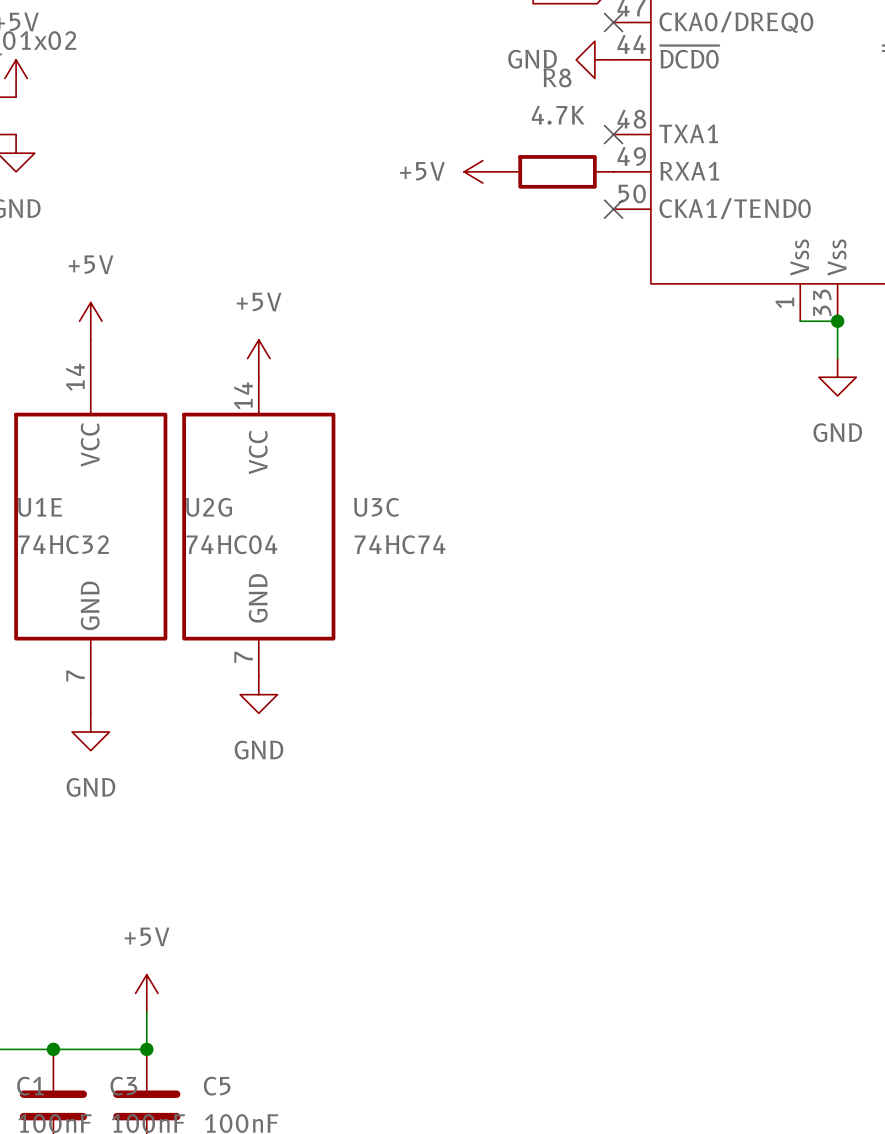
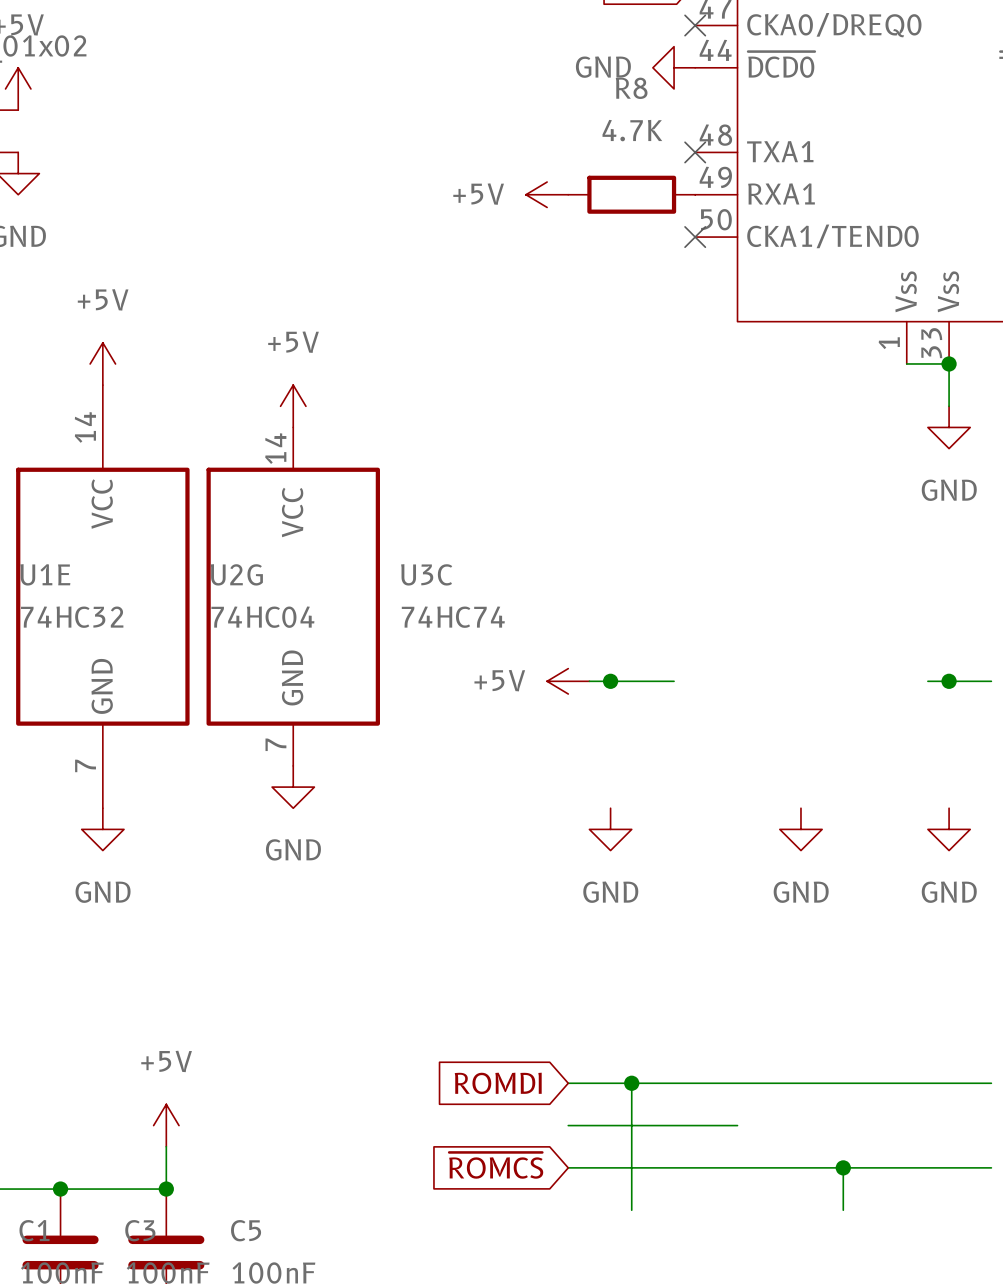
power symbol: none -> +5V (568, 681)
wire: none -> (589, 681) (674, 681)
junction: none -> (610, 681)
wire: none -> (927, 681) (991, 681)
junction: none -> (949, 681)
power symbol: none -> GND (610, 829)
power symbol: none -> GND (800, 829)
power symbol: none -> GND (949, 829)
global label: none -> ROMDI (498, 1083)
wire: none -> (568, 1083) (991, 1083)
wire: none -> (631, 1083) (631, 1210)
junction: none -> (631, 1083)
wire: none -> (568, 1125) (737, 1125)
global label: none -> ~{ROMCS} (496, 1165)
wire: none -> (568, 1167) (991, 1167)
wire: none -> (843, 1167) (843, 1210)
junction: none -> (843, 1167)

